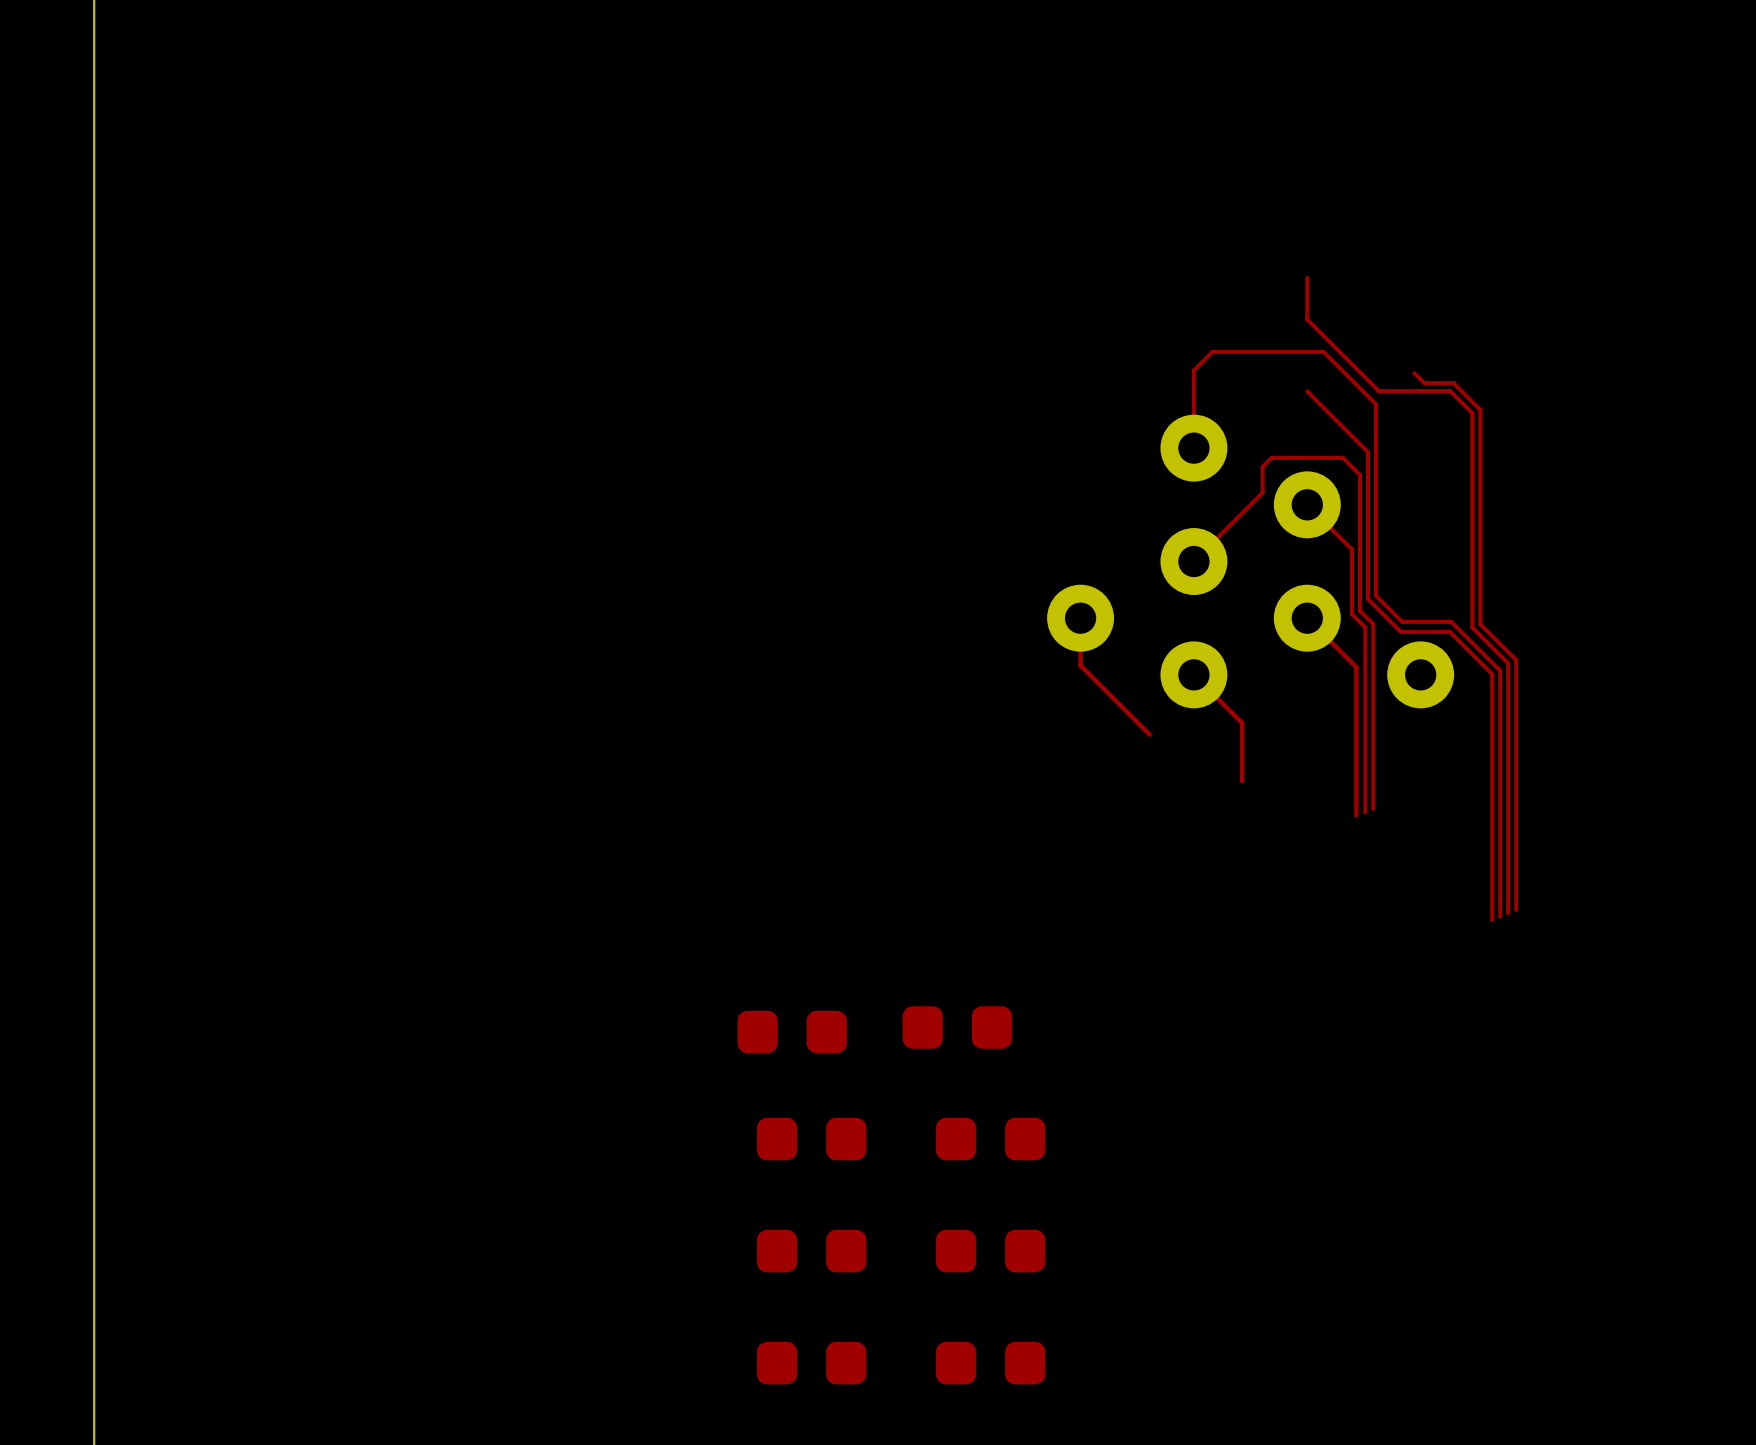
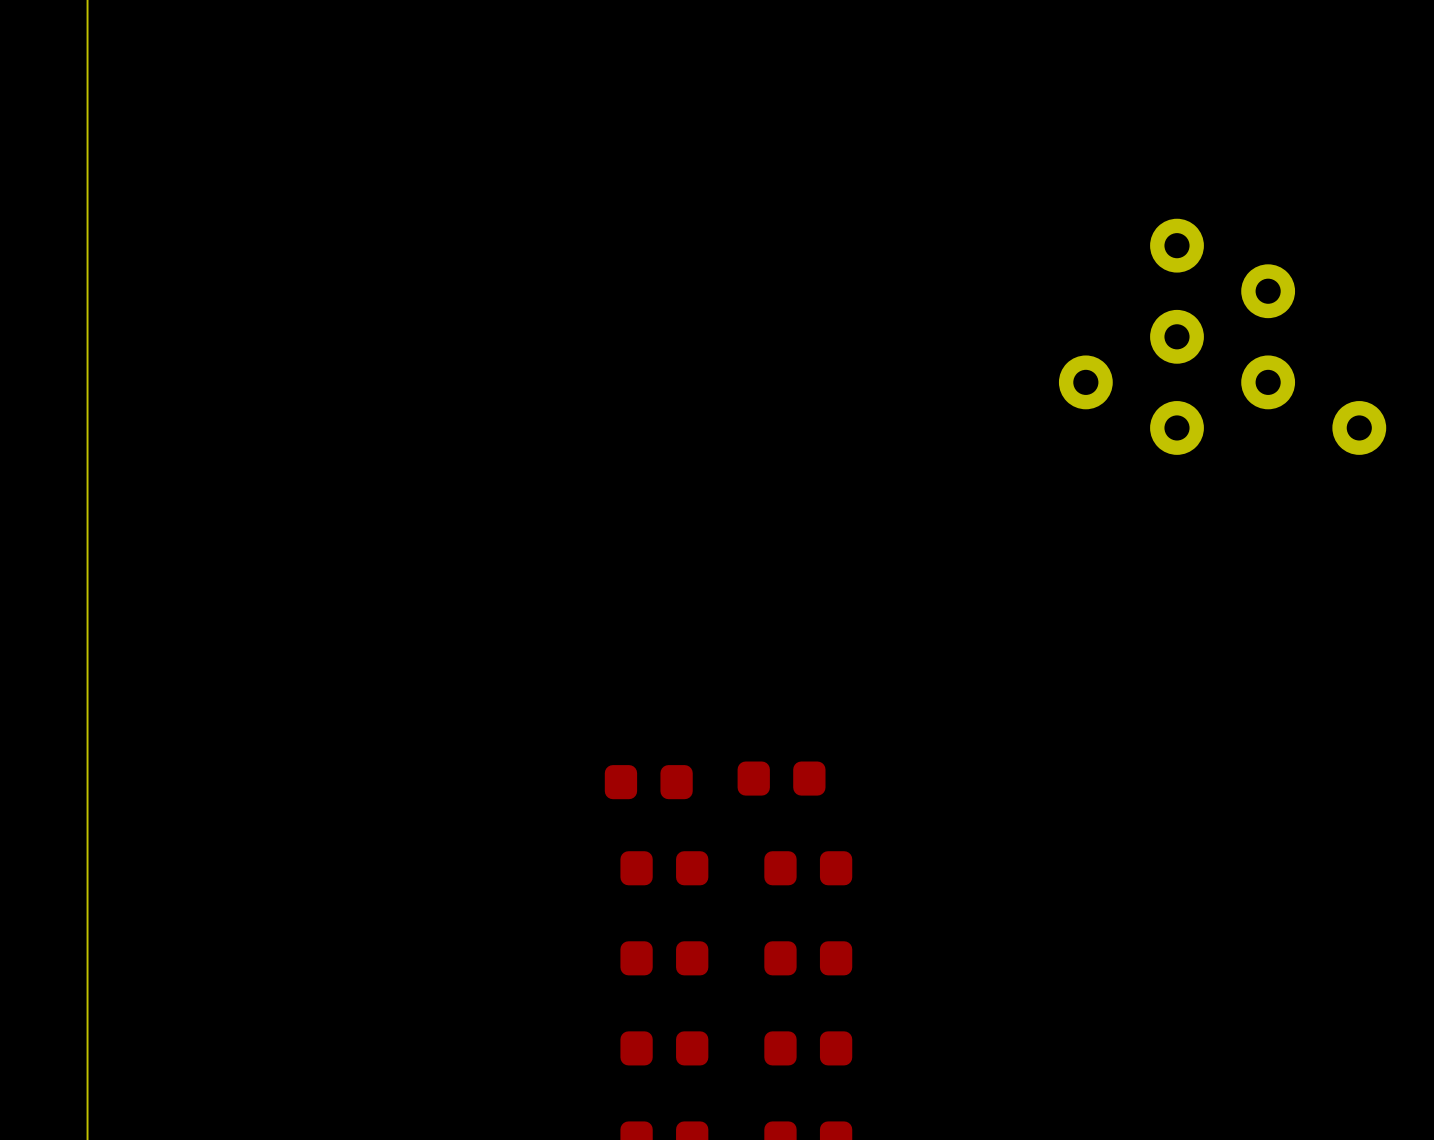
top track: (1307, 278) (1307, 319) (1378, 391) (1450, 391) (1472, 413) (1472, 627) (1508, 663) (1508, 913) -> none
part: none -> (1176, 245)
top track: (1414, 373) (1424, 383) (1453, 383) (1480, 410) (1480, 624) (1516, 659) (1516, 910) -> none
top track: (1307, 391) (1367, 452) (1367, 598) (1401, 632) (1450, 632) (1492, 674) (1492, 919) -> none
part: none -> (1268, 291)
top track: (1193, 448) (1193, 370) (1212, 351) (1323, 351) (1375, 404) (1375, 595) (1402, 621) (1451, 621) (1500, 670) (1500, 916) -> none
part: (1193, 448) -> none
part: none -> (1176, 336)
top track: (1307, 504) (1351, 549) (1351, 614) (1365, 627) (1365, 812) -> none
part position: (1307, 504) -> (1085, 382)
part: none -> (1268, 382)
top track: (1193, 561) (1262, 492) (1262, 466) (1271, 457) (1343, 457) (1359, 474) (1359, 610) (1373, 624) (1373, 809) -> none
part: (1193, 561) -> none
part: none -> (1176, 427)
part: none -> (1359, 427)
top track: (1080, 618) (1080, 665) (1149, 734) -> none
part: (1080, 618) -> none
top track: (1307, 618) (1356, 667) (1356, 815) -> none
part: (1307, 618) -> none
top track: (1193, 674) (1242, 723) (1242, 781) -> none
part: (1193, 674) -> none
part: (1420, 674) -> none

